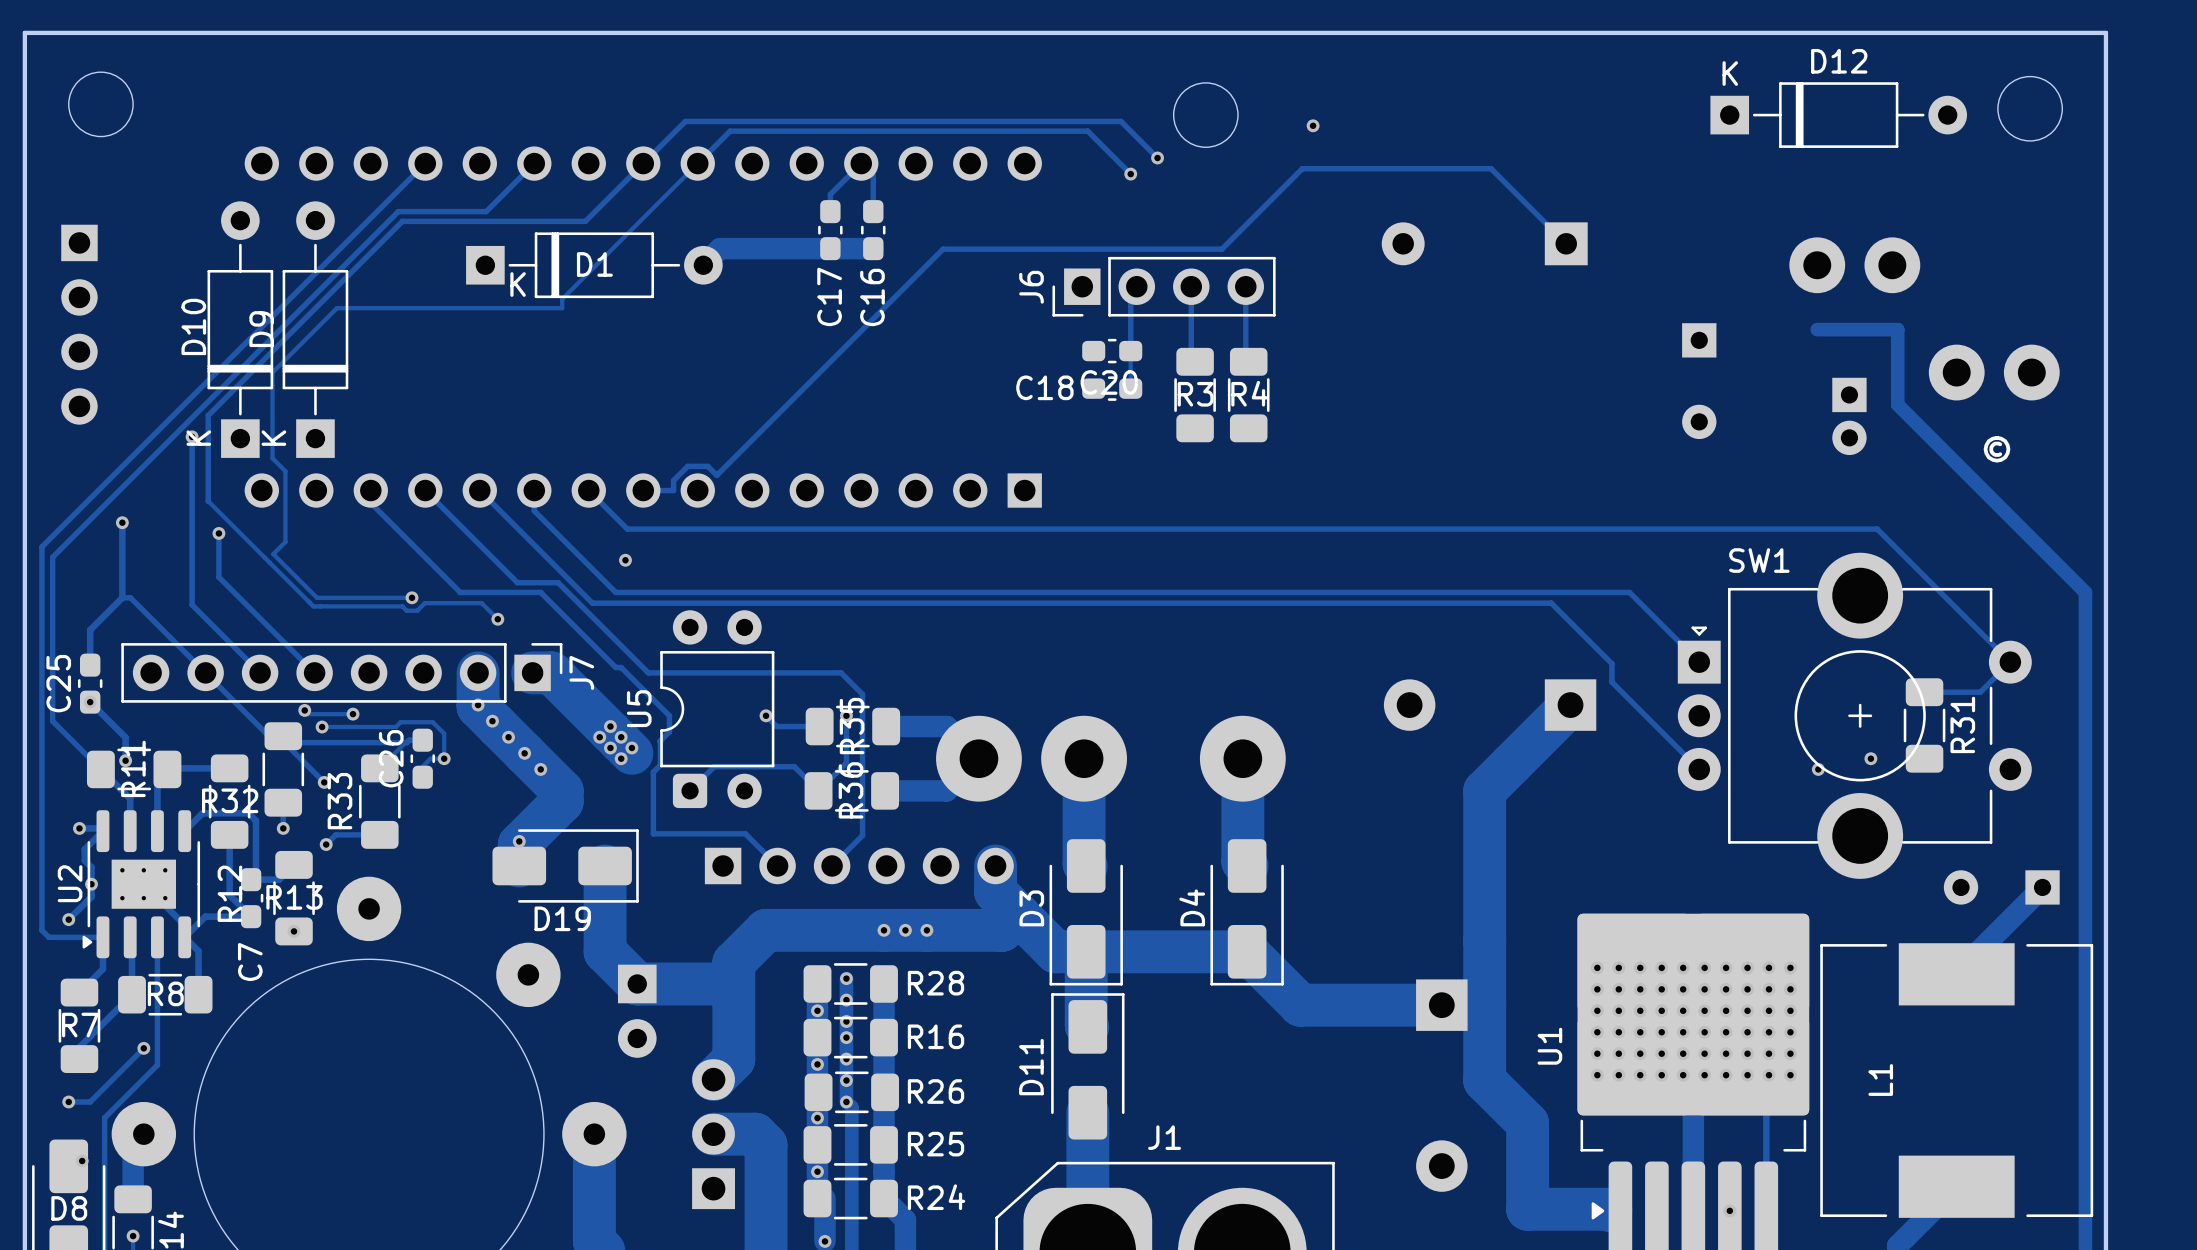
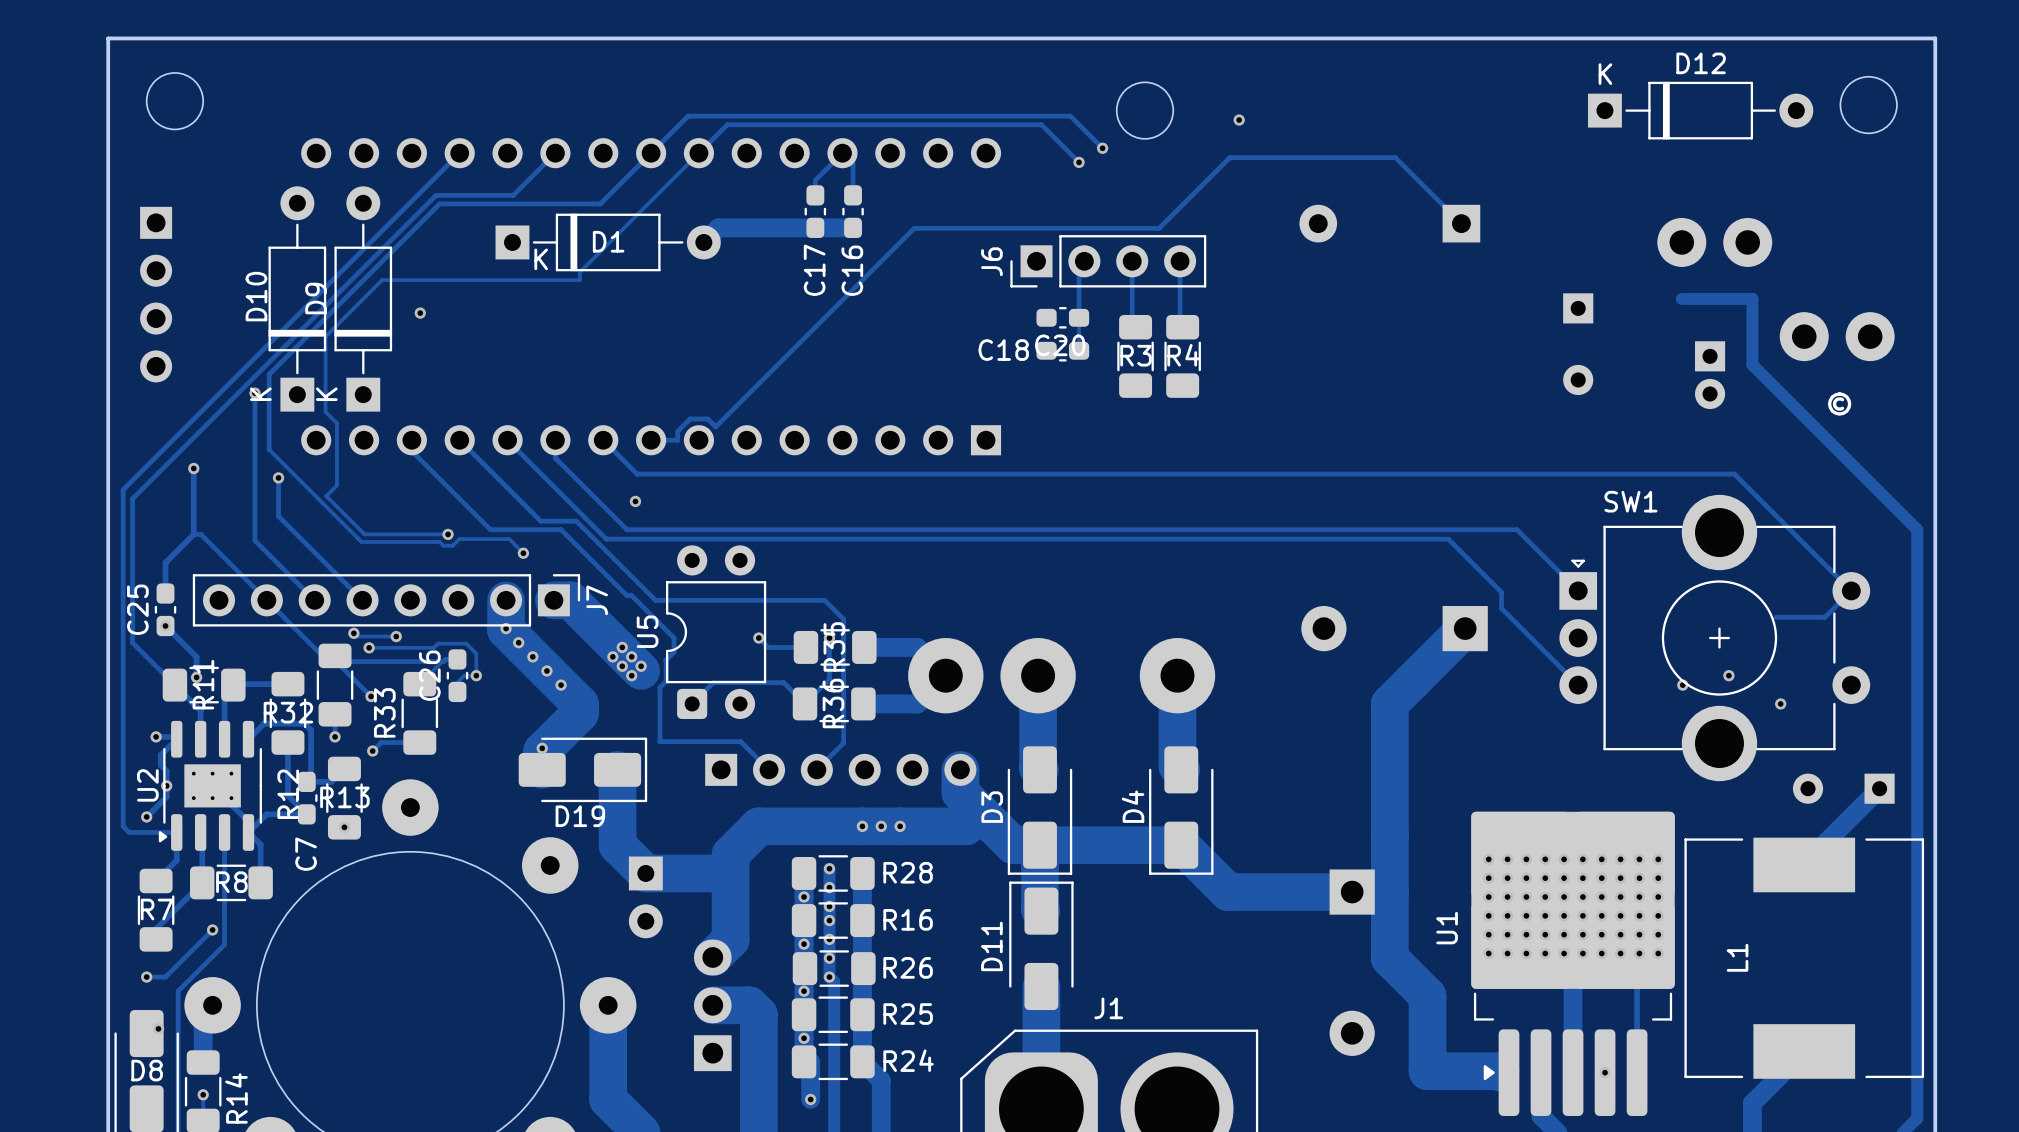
via: none -> (420, 313)
R31: (1924, 725) -> none
via: none -> (1780, 703)

